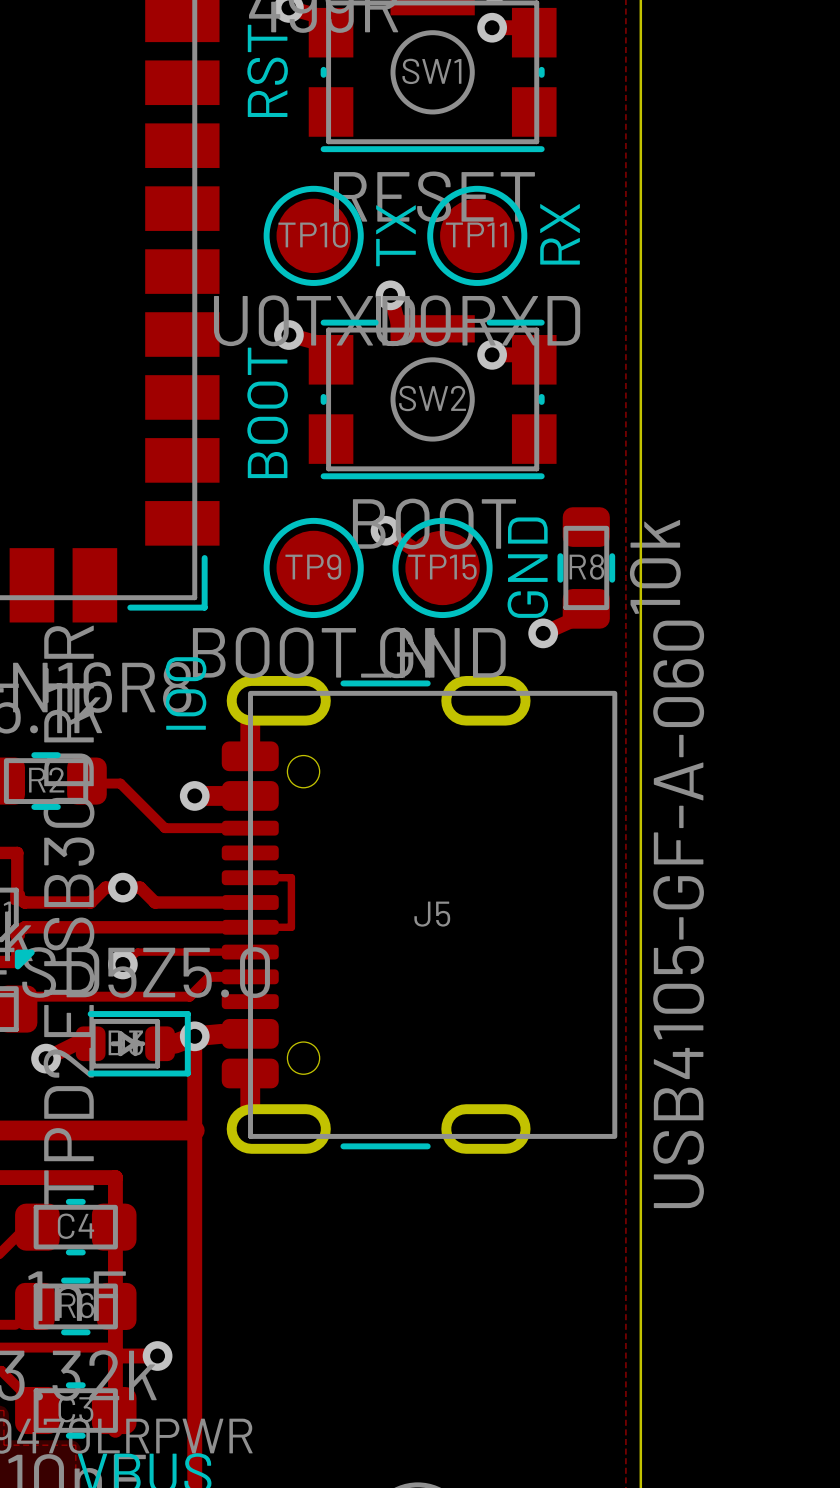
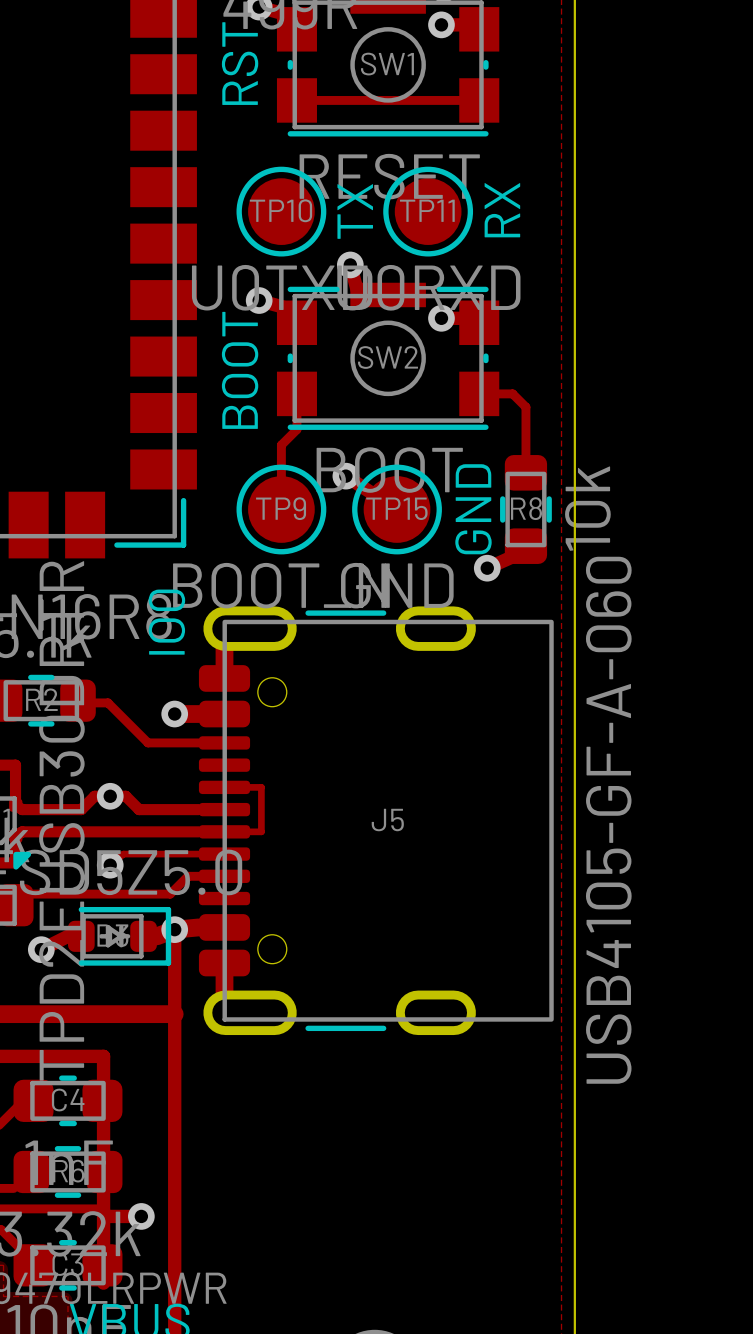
track: none -> (296, 100) (479, 100)
track: none -> (296, 393) (296, 429) (281, 445) (281, 509)
track: none -> (479, 393) (512, 393) (525, 407) (525, 472)

